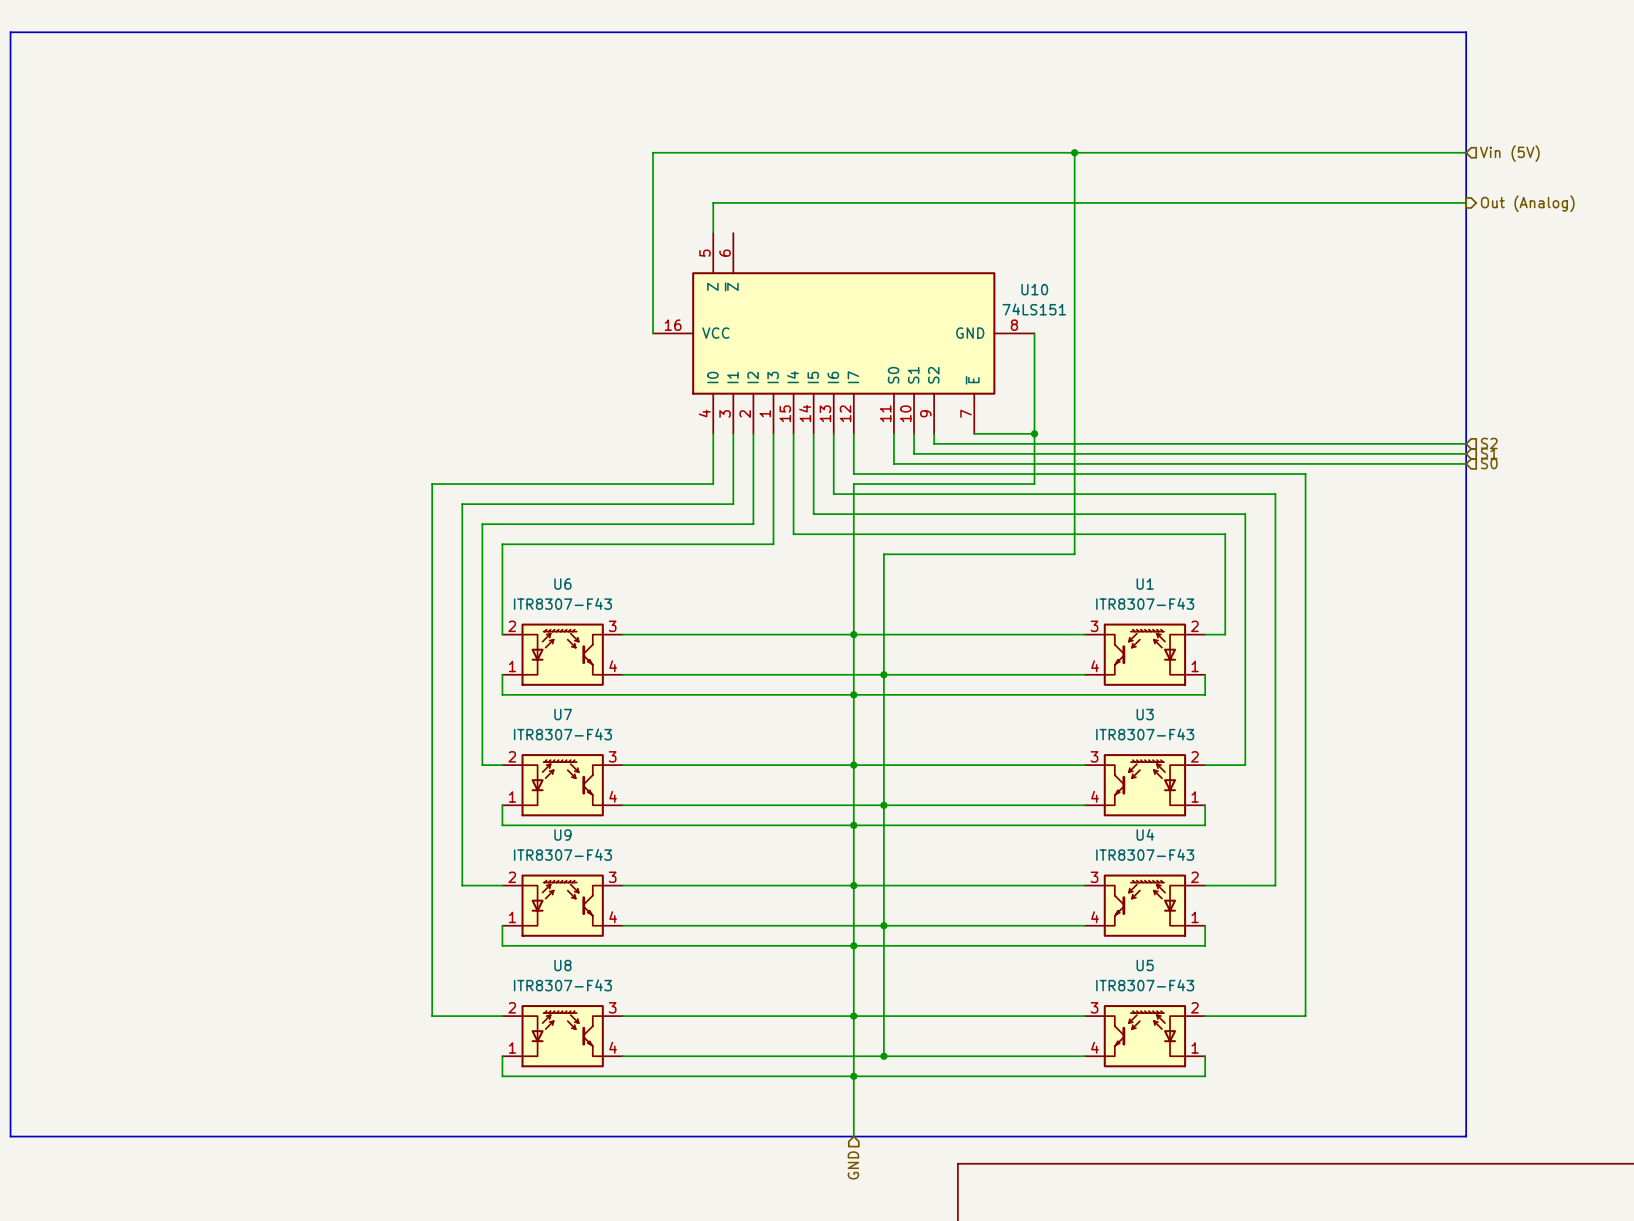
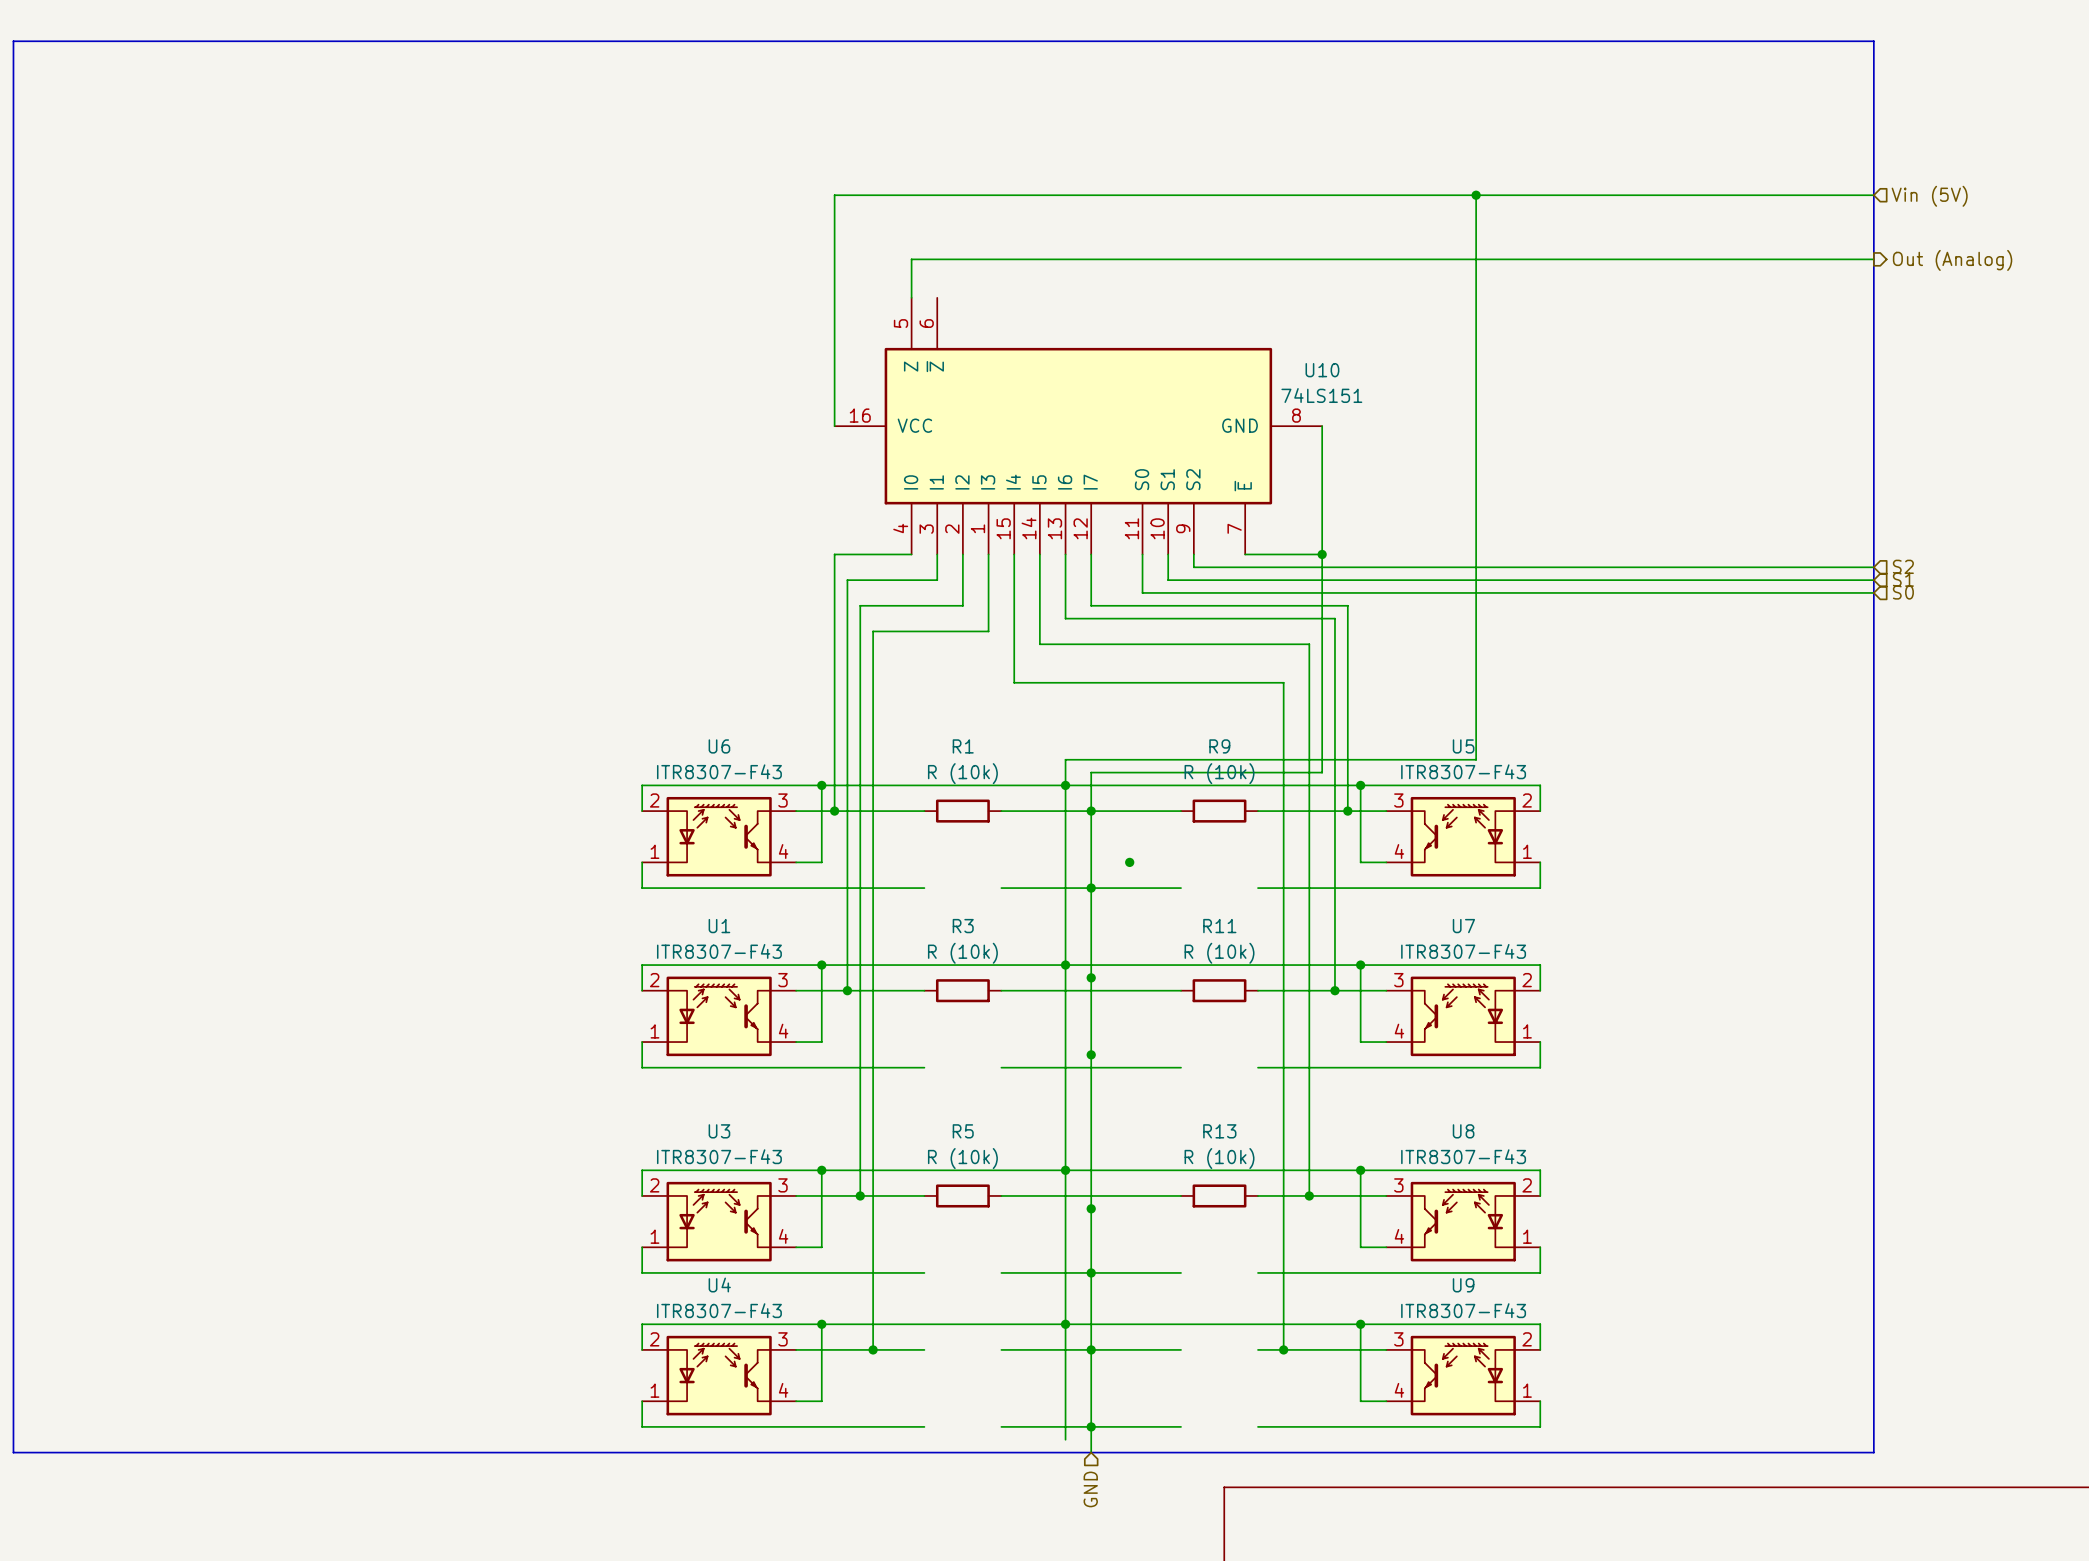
wire: (1074, 152) (1074, 554) (883, 554) (883, 1056) -> none
junction: (1074, 152) -> none
wire: none -> (1476, 195) (1476, 759) (1065, 759) (1065, 1439)
junction: none -> (1476, 195)
wire: (713, 433) (713, 484) (432, 484) (432, 1016) (502, 1016) -> (911, 554) (834, 554) (834, 811)
wire: (733, 453) (733, 504) (462, 504) (462, 885) (502, 885) -> (937, 580) (847, 580) (847, 990)
wire: (753, 473) (753, 524) (482, 524) (482, 765) (502, 765) -> (962, 605) (860, 605) (860, 1195)
wire: (1054, 473) (1305, 473) (1305, 1016) (1205, 1016) -> (1347, 605) (1347, 811)
wire: (833, 484) (833, 494) (1275, 494) (1275, 885) (1205, 885) -> none
wire: (853, 484) (853, 604) -> (1091, 618) (1065, 618)
wire: (773, 494) (773, 544) (502, 544) (502, 614) -> (1540, 811) (1540, 785) (642, 785)
wire: none -> (988, 631) (873, 631) (873, 1349)
wire: (813, 504) (813, 514) (1245, 514) (1245, 765) (1205, 765) -> (1039, 644) (1309, 644) (1309, 1195)
wire: (1004, 534) (1225, 534) (1225, 634) (1205, 634) -> (1283, 682) (1283, 1349)
U1 name: U1 (1145, 584) -> U5 (1463, 746)
wire: none -> (1091, 772) (1322, 772) (1322, 618) (1334, 618) (1334, 990)
junction: none -> (821, 785)
junction: none -> (1065, 785)
wire: none -> (1360, 785) (1360, 862)
junction: none -> (1360, 785)
junction: none -> (834, 811)
wire: (723, 634) (783, 634) -> none
R1: none -> R (10k) (962, 811)
wire: (924, 634) (984, 634) -> none
R9: none -> R (10k) (1219, 811)
junction: none -> (1347, 811)
wire: (642, 674) (1064, 674) -> (821, 862) (821, 785)
wire: (723, 694) (783, 694) -> none
wire: (924, 694) (984, 694) -> none
wire: none -> (821, 965) (821, 1042) (796, 1042)
junction: none -> (821, 965)
junction: none -> (1065, 965)
wire: none -> (1360, 965) (1360, 1042) (1386, 1042)
junction: none -> (1360, 965)
wire: (622, 765) (1084, 765) -> none
wire: none -> (642, 990) (642, 965) (1540, 965) (1540, 990)
wire: none -> (796, 990) (924, 990)
junction: none -> (847, 990)
R3: none -> R (10k) (962, 990)
wire: none -> (1001, 990) (1181, 990)
R11: none -> R (10k) (1219, 990)
wire: none -> (1258, 990) (1386, 990)
junction: none -> (1334, 990)
U7 flip: as is (562, 785) -> left-right (1463, 1016)
U7 position: (562, 785) -> (1463, 1016)
U3 flip: as is (1144, 785) -> left-right (719, 1221)
U3 position: (1144, 785) -> (719, 1221)
U1: none -> ITR8307-F43 (719, 1016)
wire: (502, 805) (502, 815) -> none
wire: (622, 805) (1084, 805) -> none
junction: (883, 805) -> none
wire: (1205, 805) (1205, 815) -> none
wire: (502, 825) (1205, 825) -> (642, 1054) (642, 1067) (924, 1067)
wire: none -> (1540, 1054) (1540, 1067) (1258, 1067)
wire: none -> (1001, 1067) (1181, 1067)
wire: (622, 885) (1084, 885) -> none
junction: (853, 885) -> none
U9 flip: as is (562, 905) -> left-right (1463, 1375)
U9 position: (562, 905) -> (1463, 1375)
U4 flip: as is (1144, 905) -> left-right (719, 1375)
U4 position: (1144, 905) -> (719, 1375)
wire: none -> (821, 1170) (821, 1247) (796, 1247)
junction: none -> (821, 1170)
junction: none -> (1065, 1170)
wire: none -> (1360, 1170) (1360, 1247) (1386, 1247)
junction: none -> (1360, 1170)
wire: none -> (642, 1183) (642, 1170) (1540, 1170) (1540, 1183)
wire: (622, 925) (1084, 925) -> none
junction: (883, 925) -> none
wire: (502, 935) (502, 945) (1205, 945) (1205, 935) -> none
wire: none -> (796, 1195) (924, 1195)
junction: none -> (860, 1195)
R5: none -> R (10k) (962, 1195)
wire: none -> (1001, 1195) (1181, 1195)
R13: none -> R (10k) (1219, 1195)
wire: none -> (1258, 1195) (1386, 1195)
junction: none -> (1309, 1195)
wire: none -> (642, 1247) (642, 1272) (924, 1272)
wire: none -> (1540, 1247) (1540, 1272) (1258, 1272)
wire: none -> (1001, 1272) (1181, 1272)
junction: none -> (1091, 1272)
wire: (622, 1016) (1084, 1016) -> none
junction: (853, 1016) -> none
U8 flip: as is (562, 1036) -> left-right (1463, 1221)
U8 position: (562, 1036) -> (1463, 1221)
wire: none -> (821, 1324) (821, 1401) (796, 1401)
junction: none -> (821, 1324)
junction: none -> (1065, 1324)
wire: none -> (1360, 1324) (1360, 1401) (1386, 1401)
junction: none -> (1360, 1324)
U5: ITR8307-F43 (1144, 1036) -> none
wire: (502, 1056) (502, 1076) (1205, 1076) (1205, 1056) -> (642, 1349) (642, 1324) (1540, 1324) (1540, 1349)
junction: none -> (873, 1349)
wire: (723, 1056) (783, 1056) -> none
junction: none -> (1091, 1349)
junction: (883, 1056) -> none
wire: (924, 1056) (984, 1056) -> none
junction: none -> (1283, 1349)
junction: (853, 1076) -> none
wire: none -> (642, 1401) (642, 1426) (924, 1426)
wire: none -> (1540, 1401) (1540, 1426) (1258, 1426)
wire: none -> (1001, 1426) (1181, 1426)
junction: none -> (1091, 1426)

